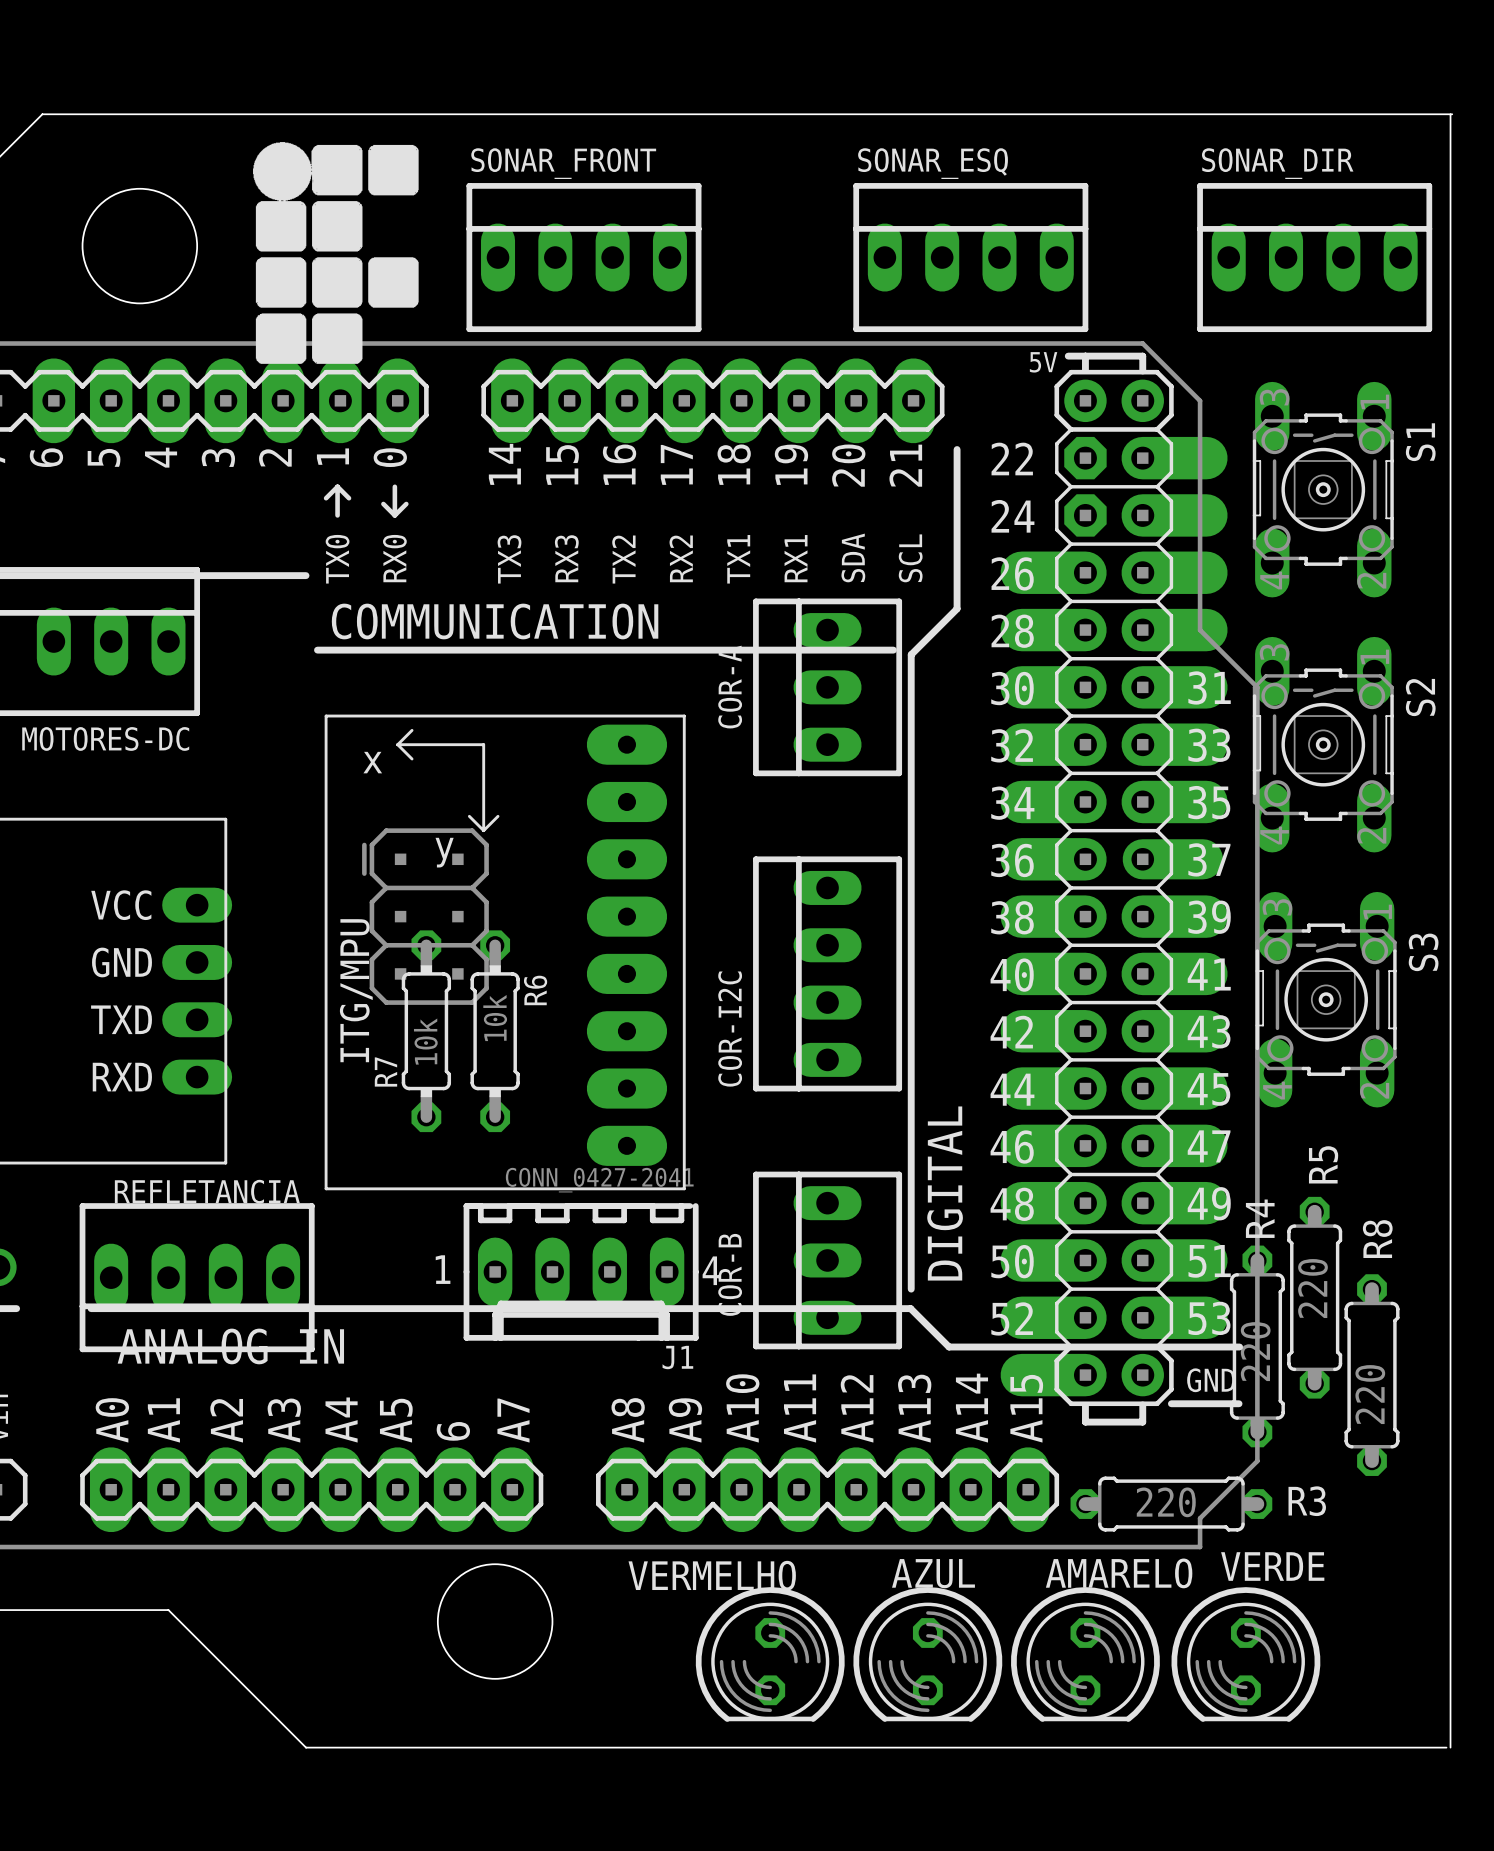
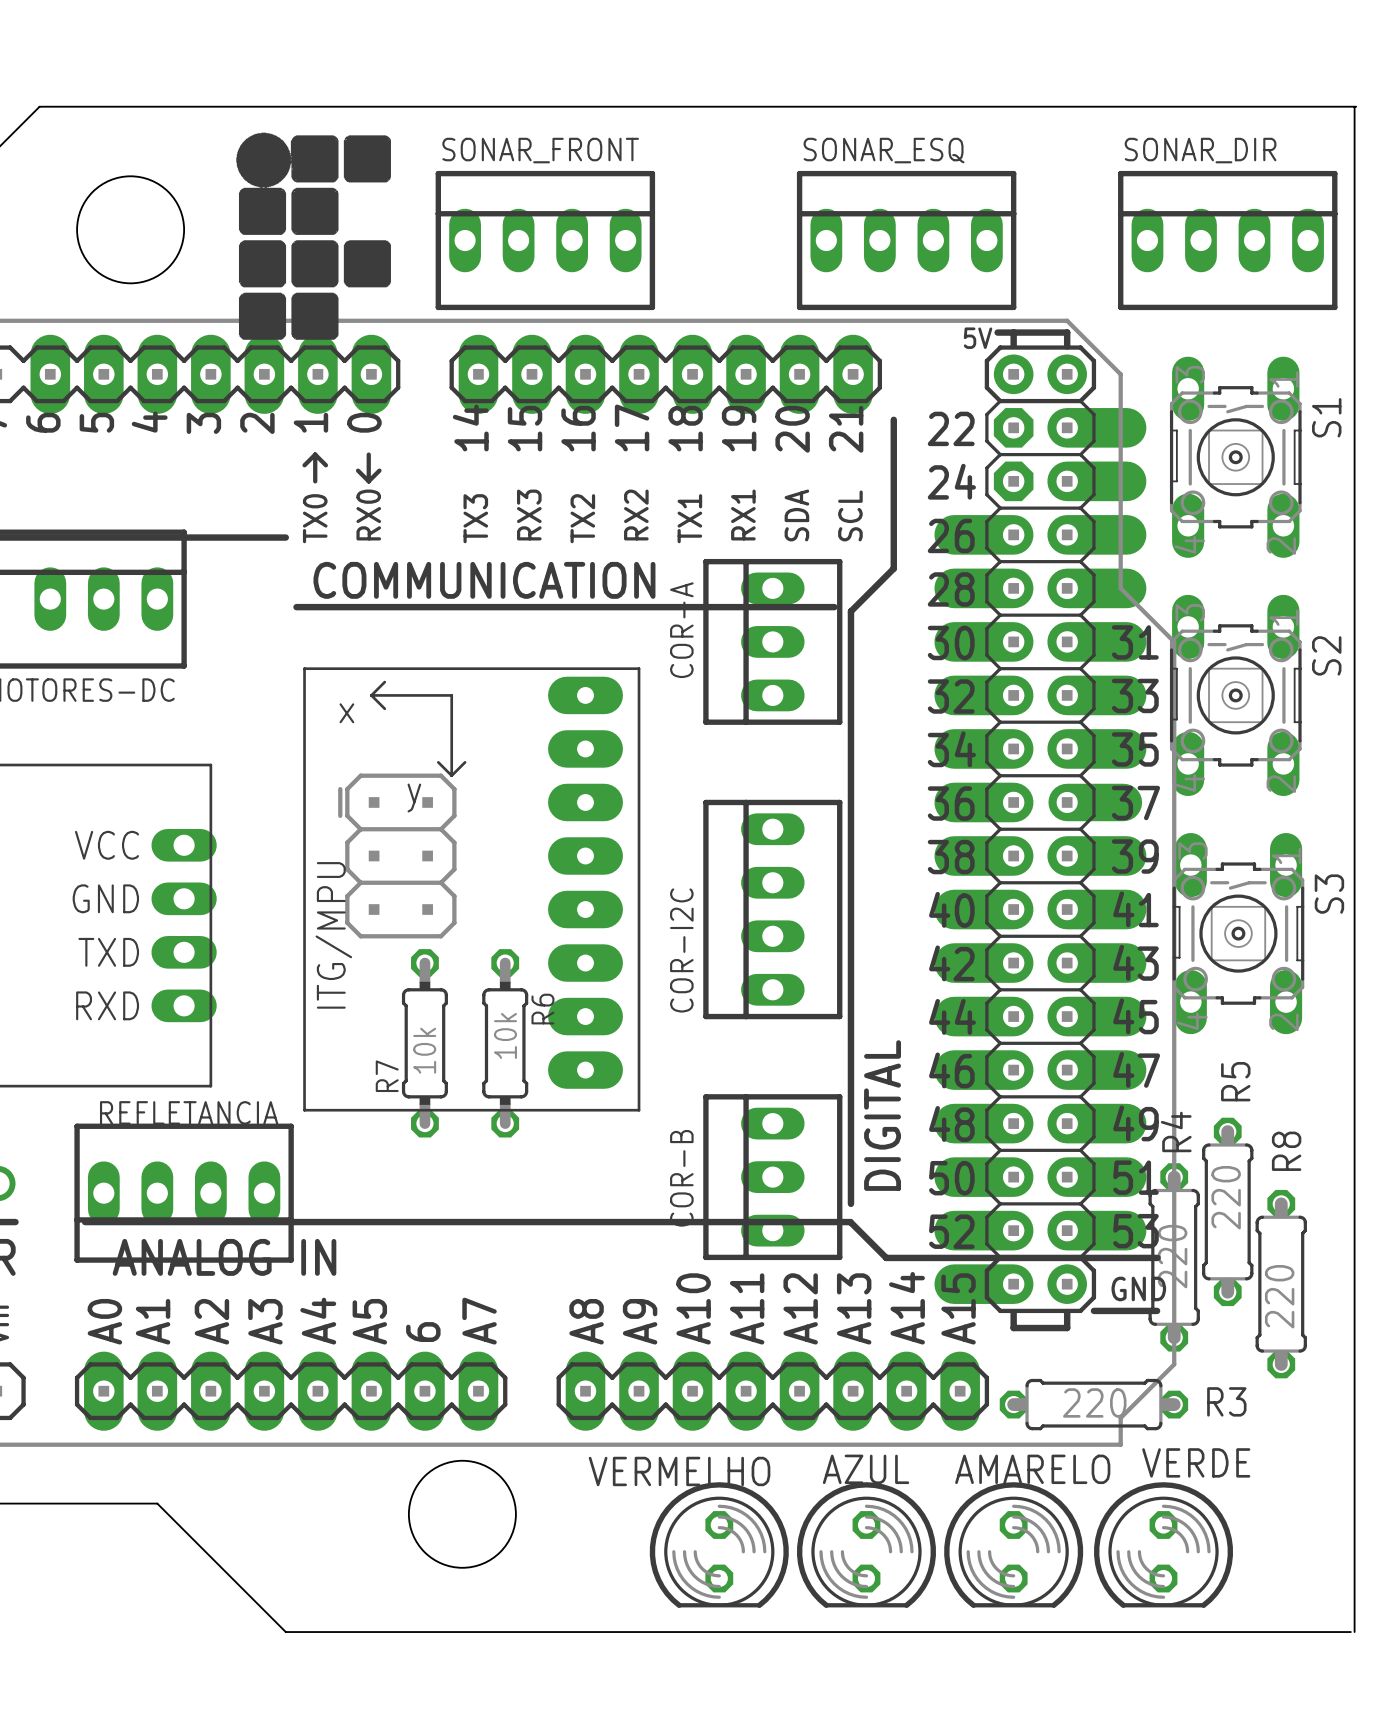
R7 position: (426, 1031) -> (424, 1043)
R6 position: (495, 1031) -> (505, 1043)
J1: CONN_0427-2041 (581, 1271) -> none

